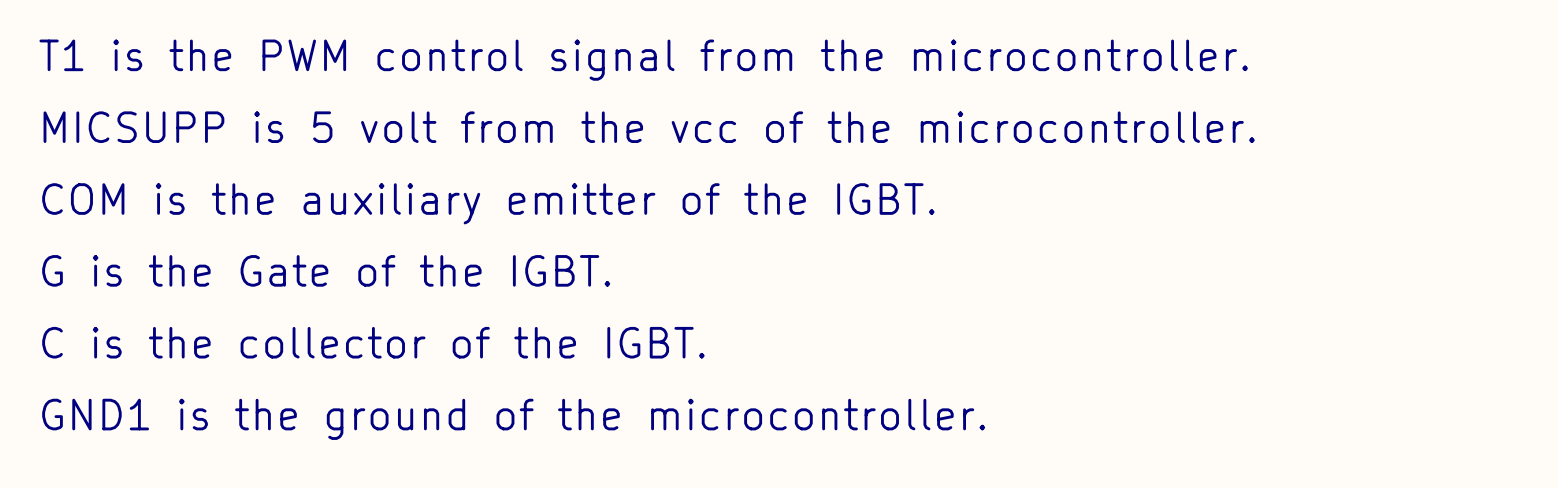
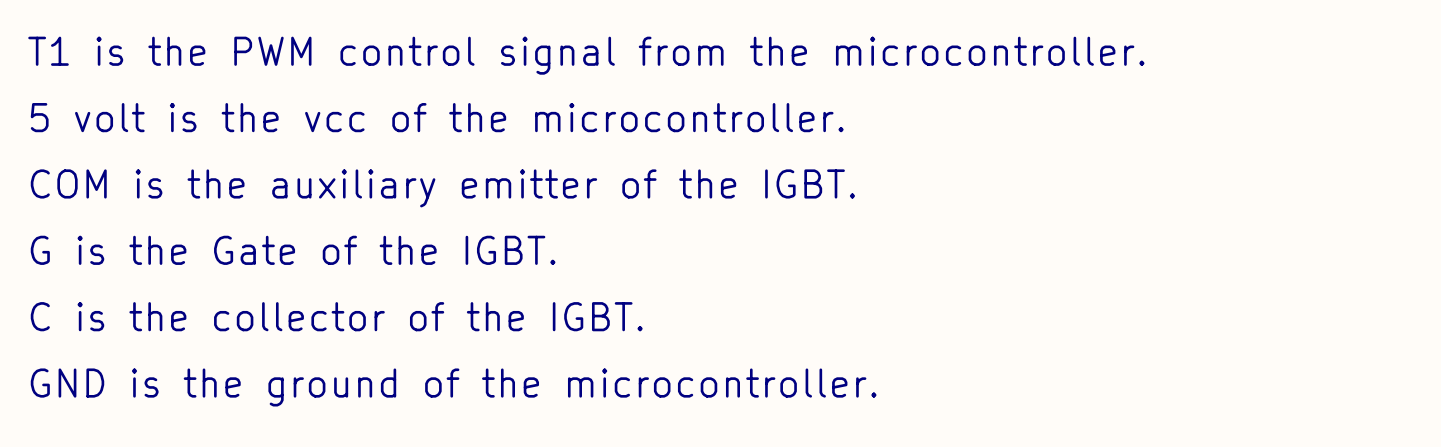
text: MICSUPP is 5 volt from the vcc of the microcontroller. (649, 127) -> 5 volt is the vcc of the microcontroller. (437, 117)
text: GND1 is the ground of the microcontroller. (513, 419) -> GND is the ground of the microcontroller. (453, 387)

